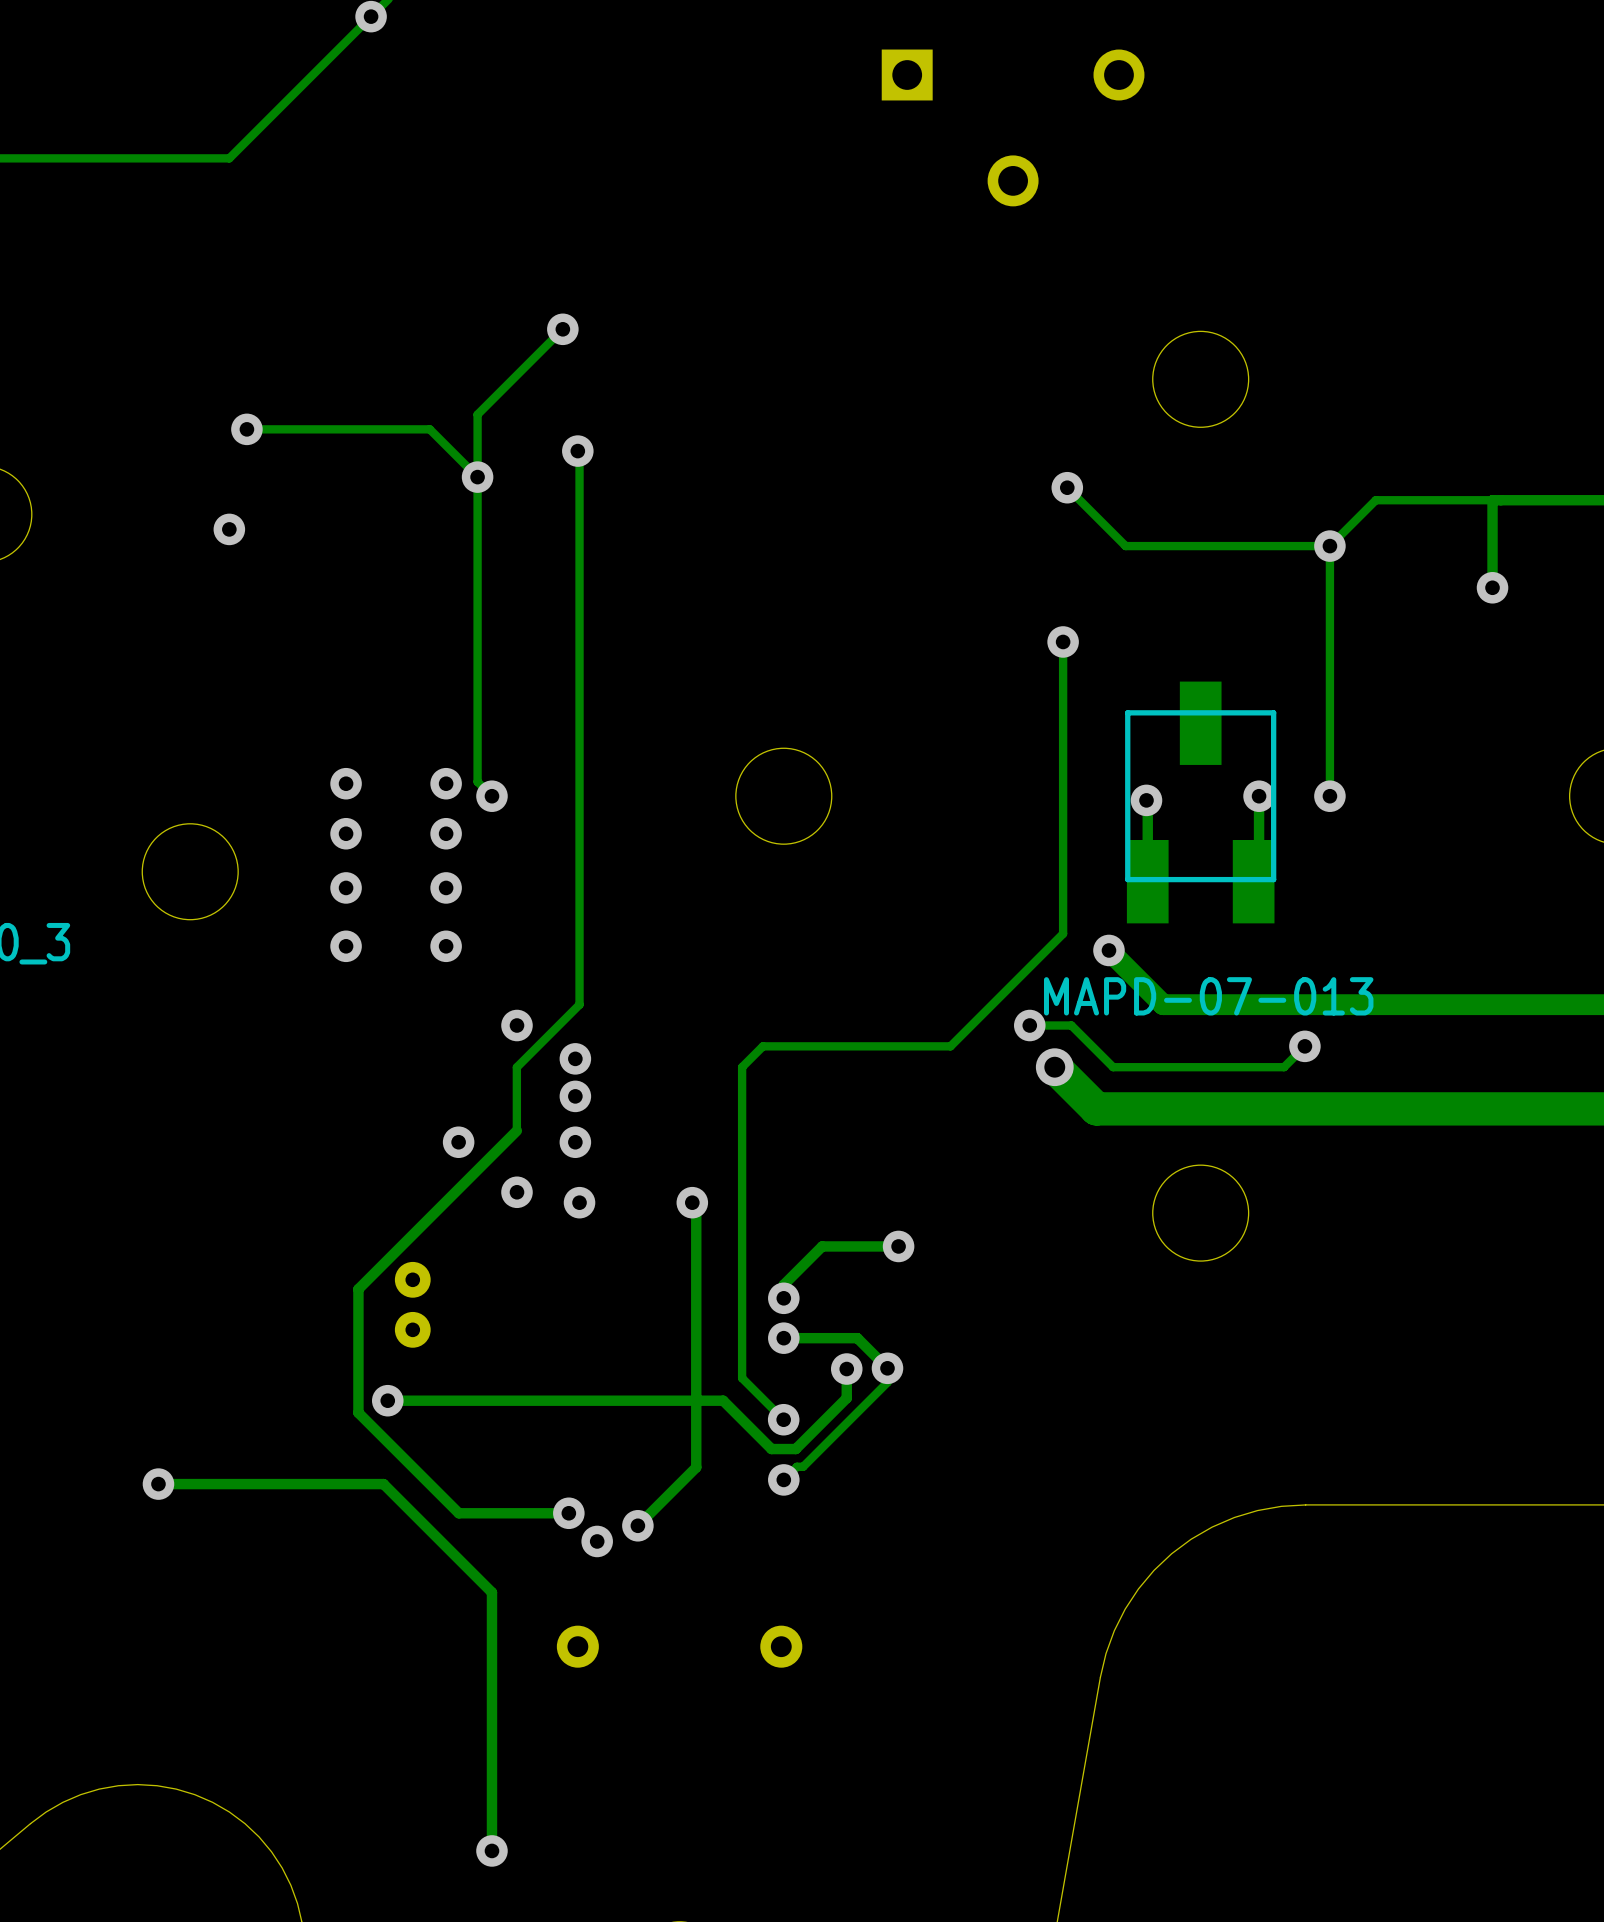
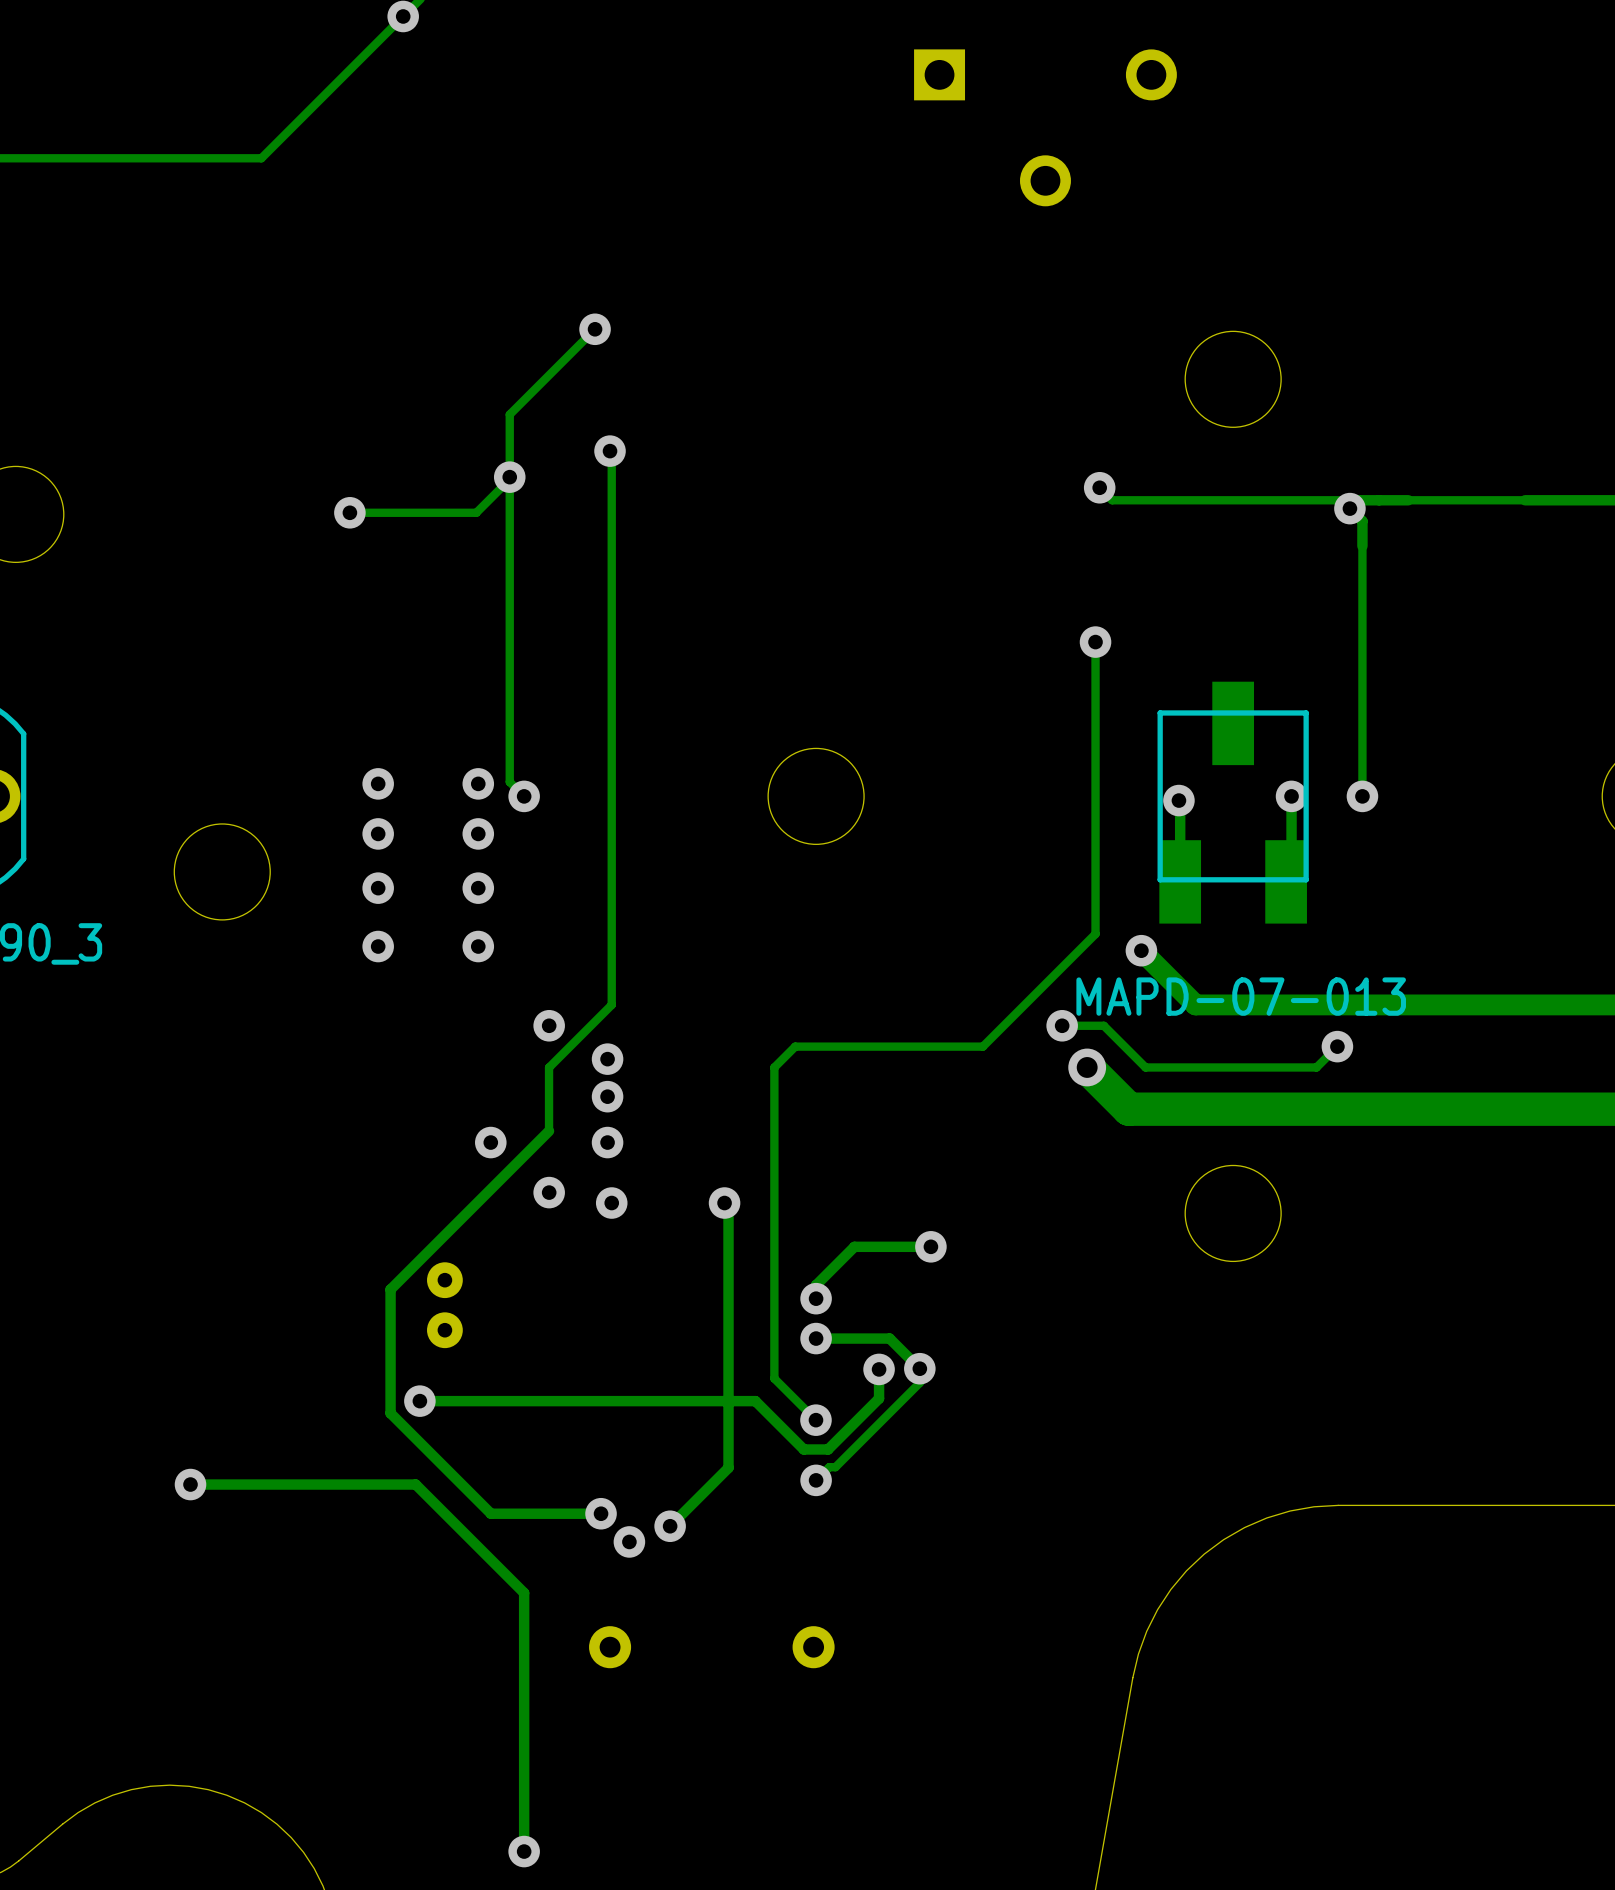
track: (246, 429) (429, 429) (477, 477) -> none
via: (246, 429) -> none
track: none -> (509, 479) (476, 512) (349, 512)
track: (1375, 500) (1329, 546) (1125, 546) (1079, 500) -> (1379, 500) (1112, 500)
track: none -> (1408, 500) (1358, 500) (1349, 508) (1362, 521) (1362, 546)
track: (1500, 500) (1492, 500) (1492, 587) -> none
via: none -> (349, 512)
via: (229, 529) -> none
via position: (1329, 546) -> (1349, 508)
via: (1492, 587) -> none

